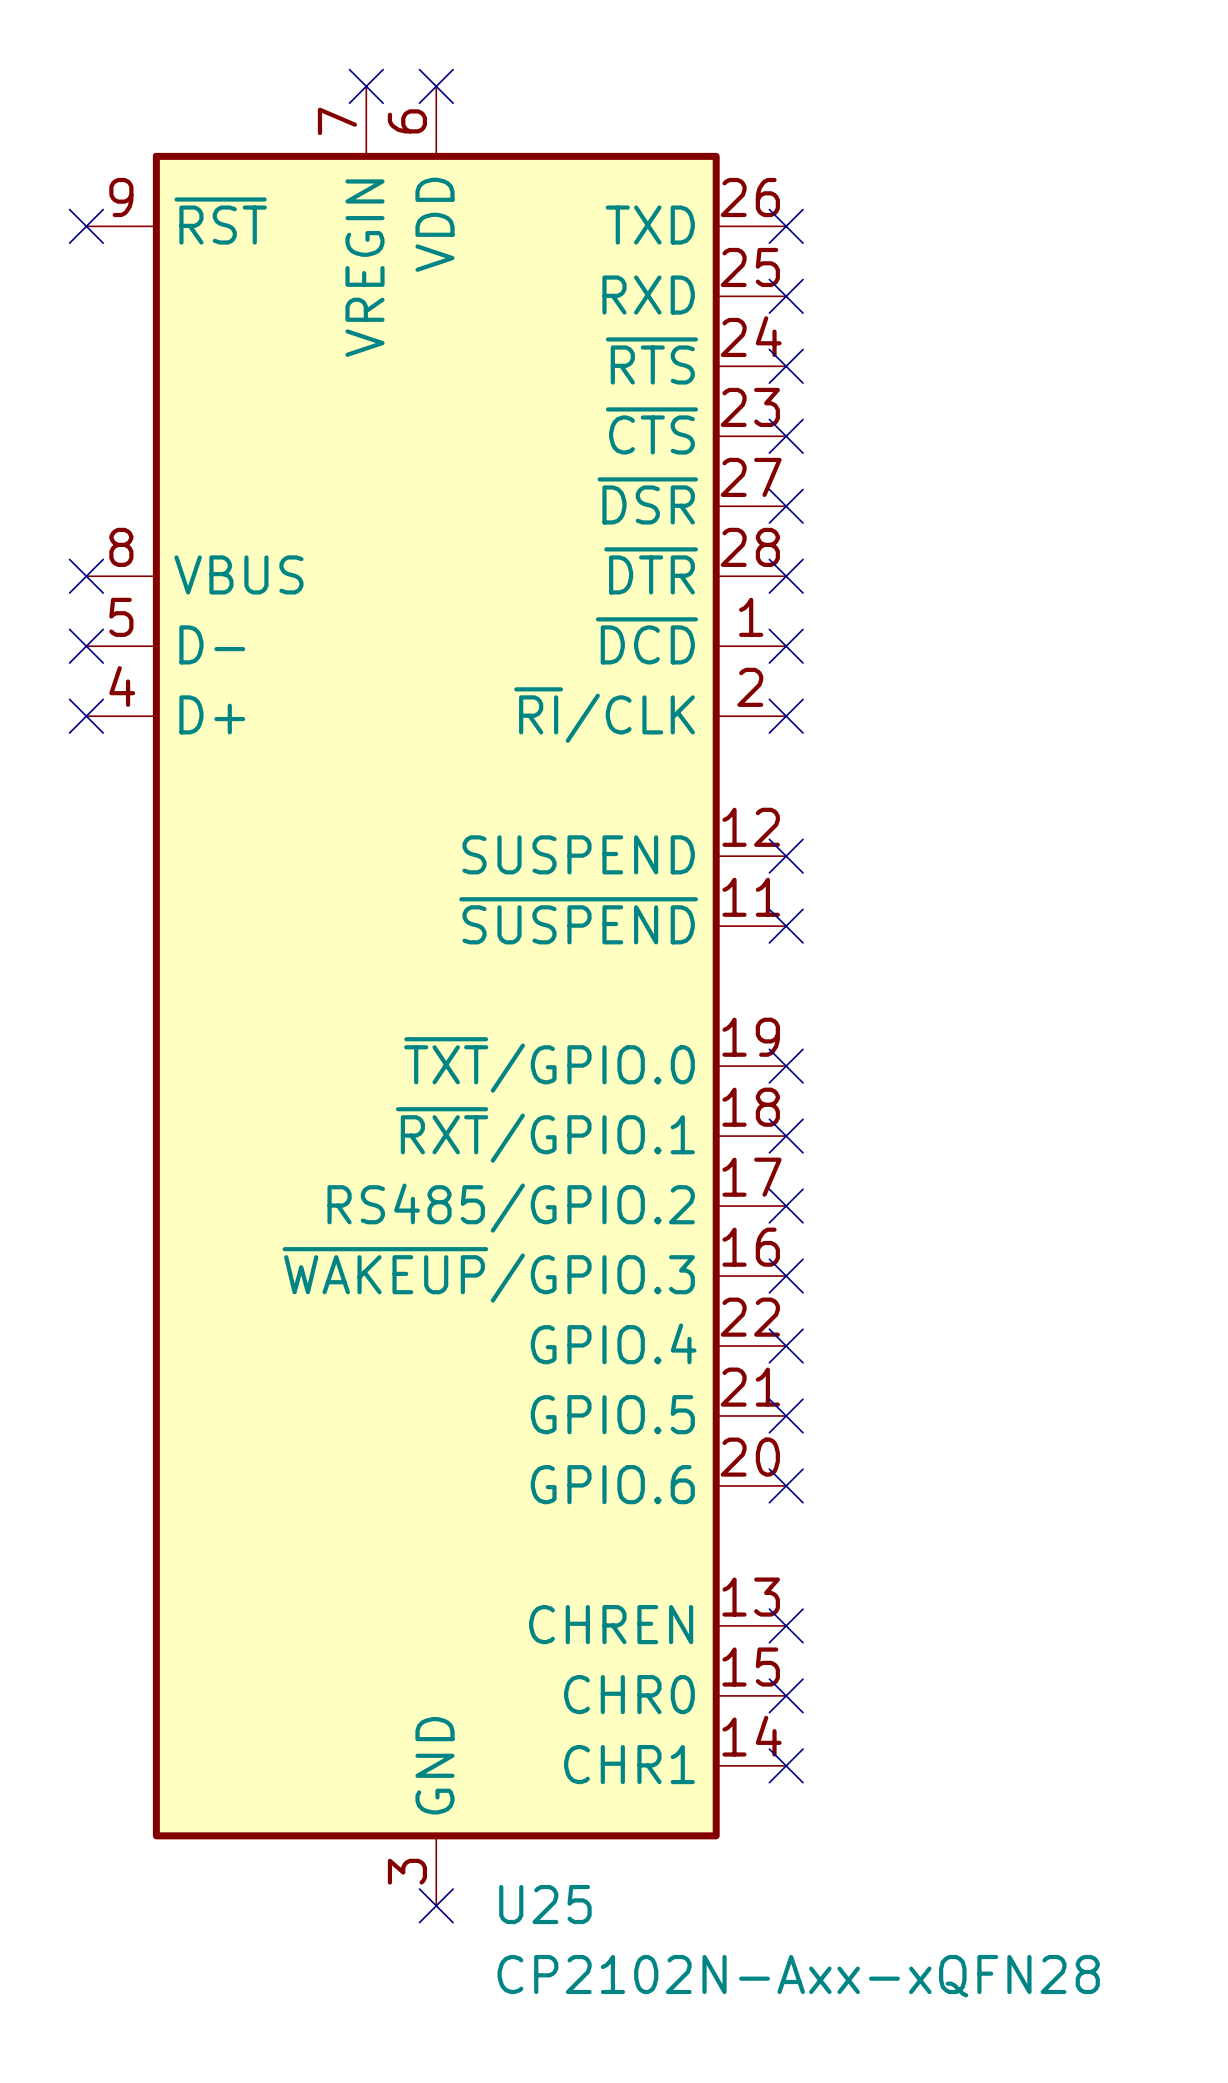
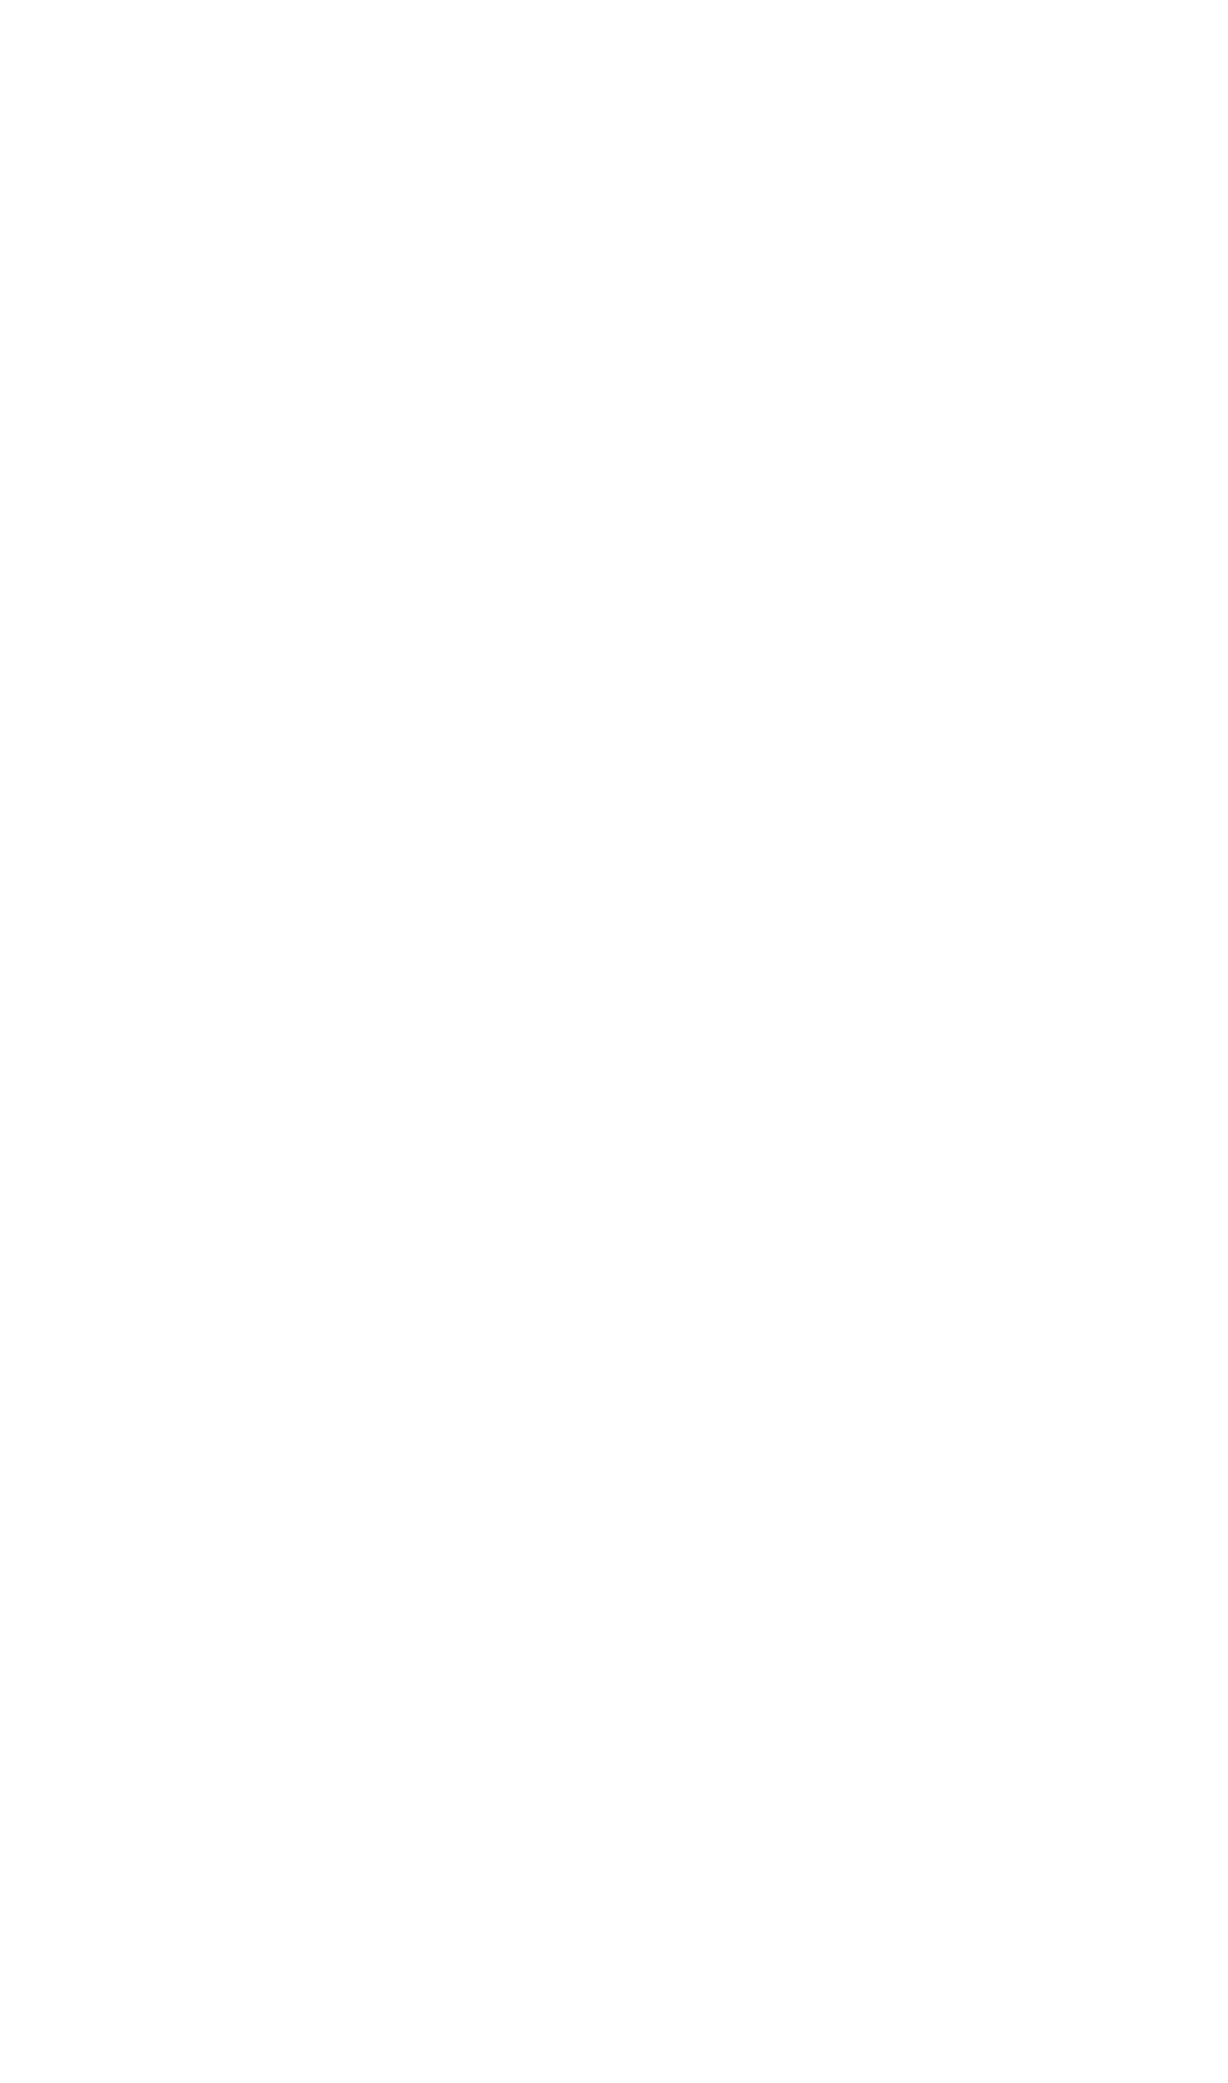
no-connect mark: (366, 86) -> none
no-connect mark: (436, 86) -> none
no-connect mark: (86, 226) -> none
no-connect mark: (786, 226) -> none
no-connect mark: (786, 296) -> none
no-connect mark: (786, 366) -> none
no-connect mark: (786, 436) -> none
no-connect mark: (786, 506) -> none
no-connect mark: (86, 576) -> none
no-connect mark: (786, 576) -> none
no-connect mark: (86, 646) -> none
no-connect mark: (786, 646) -> none
no-connect mark: (86, 716) -> none
no-connect mark: (786, 716) -> none
no-connect mark: (786, 856) -> none
no-connect mark: (786, 926) -> none
U25: CP2102N-Axx-xQFN28 (436, 996) -> none
no-connect mark: (786, 1066) -> none
no-connect mark: (786, 1136) -> none
no-connect mark: (786, 1206) -> none
no-connect mark: (786, 1276) -> none
no-connect mark: (786, 1346) -> none
no-connect mark: (786, 1415) -> none
no-connect mark: (786, 1485) -> none
no-connect mark: (786, 1625) -> none
no-connect mark: (786, 1695) -> none
no-connect mark: (786, 1765) -> none
no-connect mark: (436, 1905) -> none

